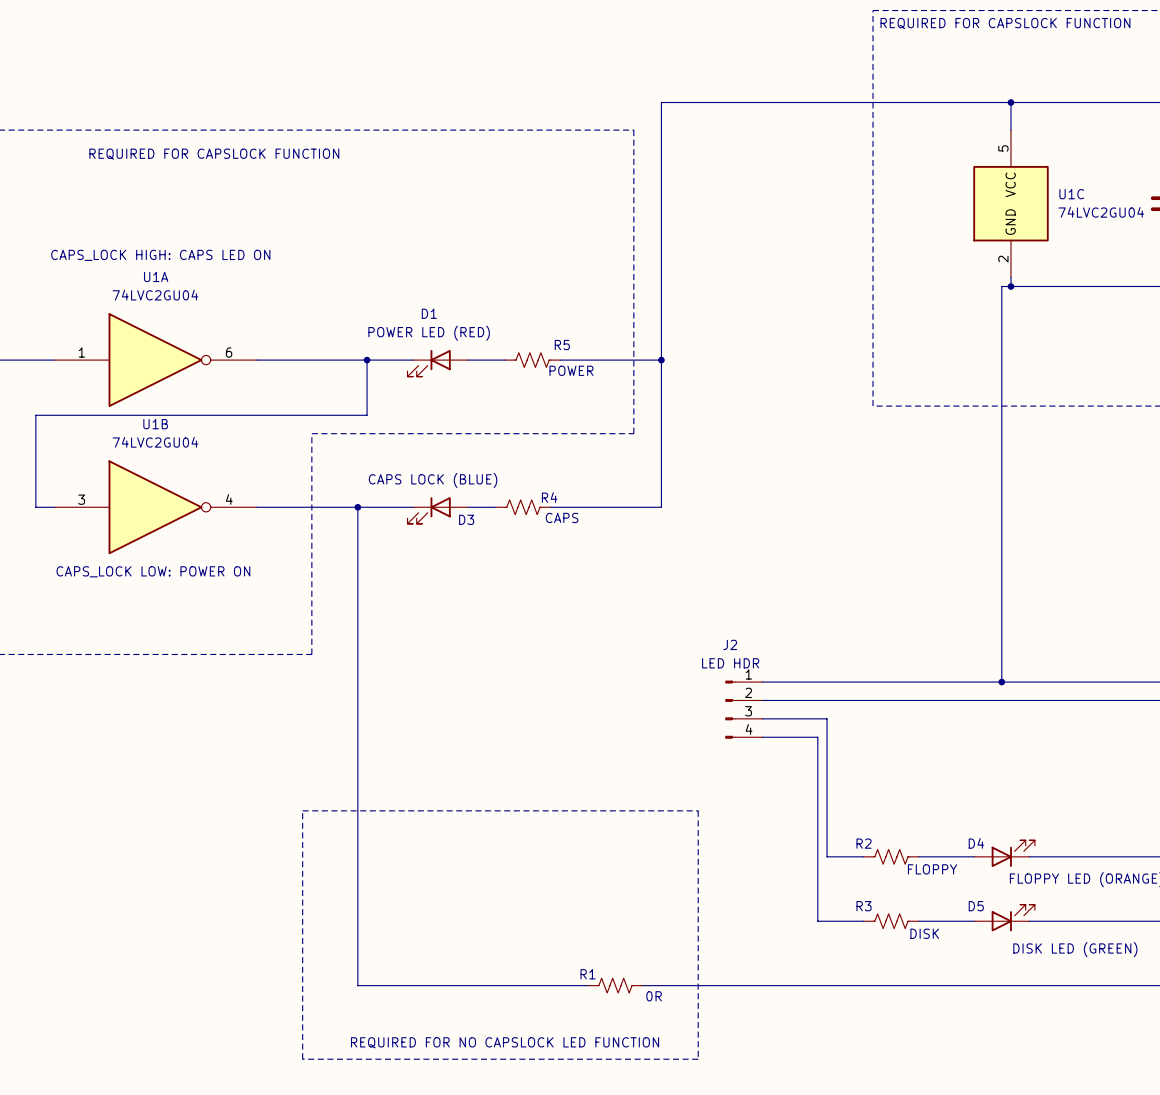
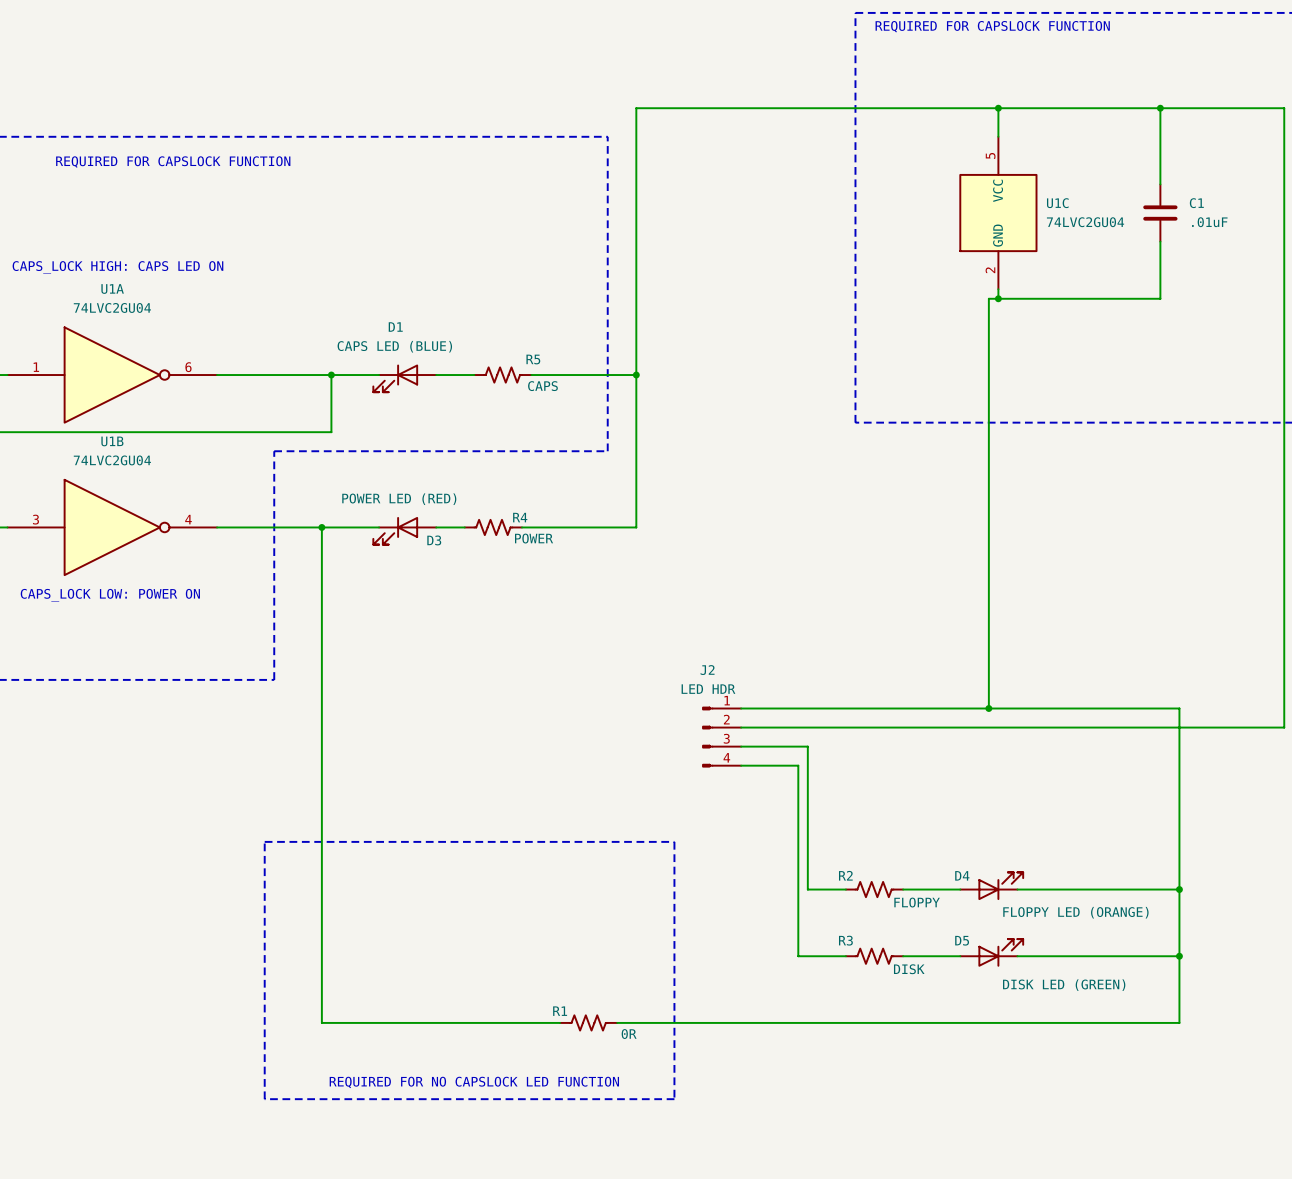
D1 value: POWER LED (RED) (429, 333) -> CAPS LED (BLUE) (394, 346)
R5 value: POWER (571, 370) -> CAPS (542, 386)
D3 value: CAPS LOCK (BLUE) (433, 480) -> POWER LED (RED) (399, 499)
R4 value: CAPS (562, 517) -> POWER (534, 538)

